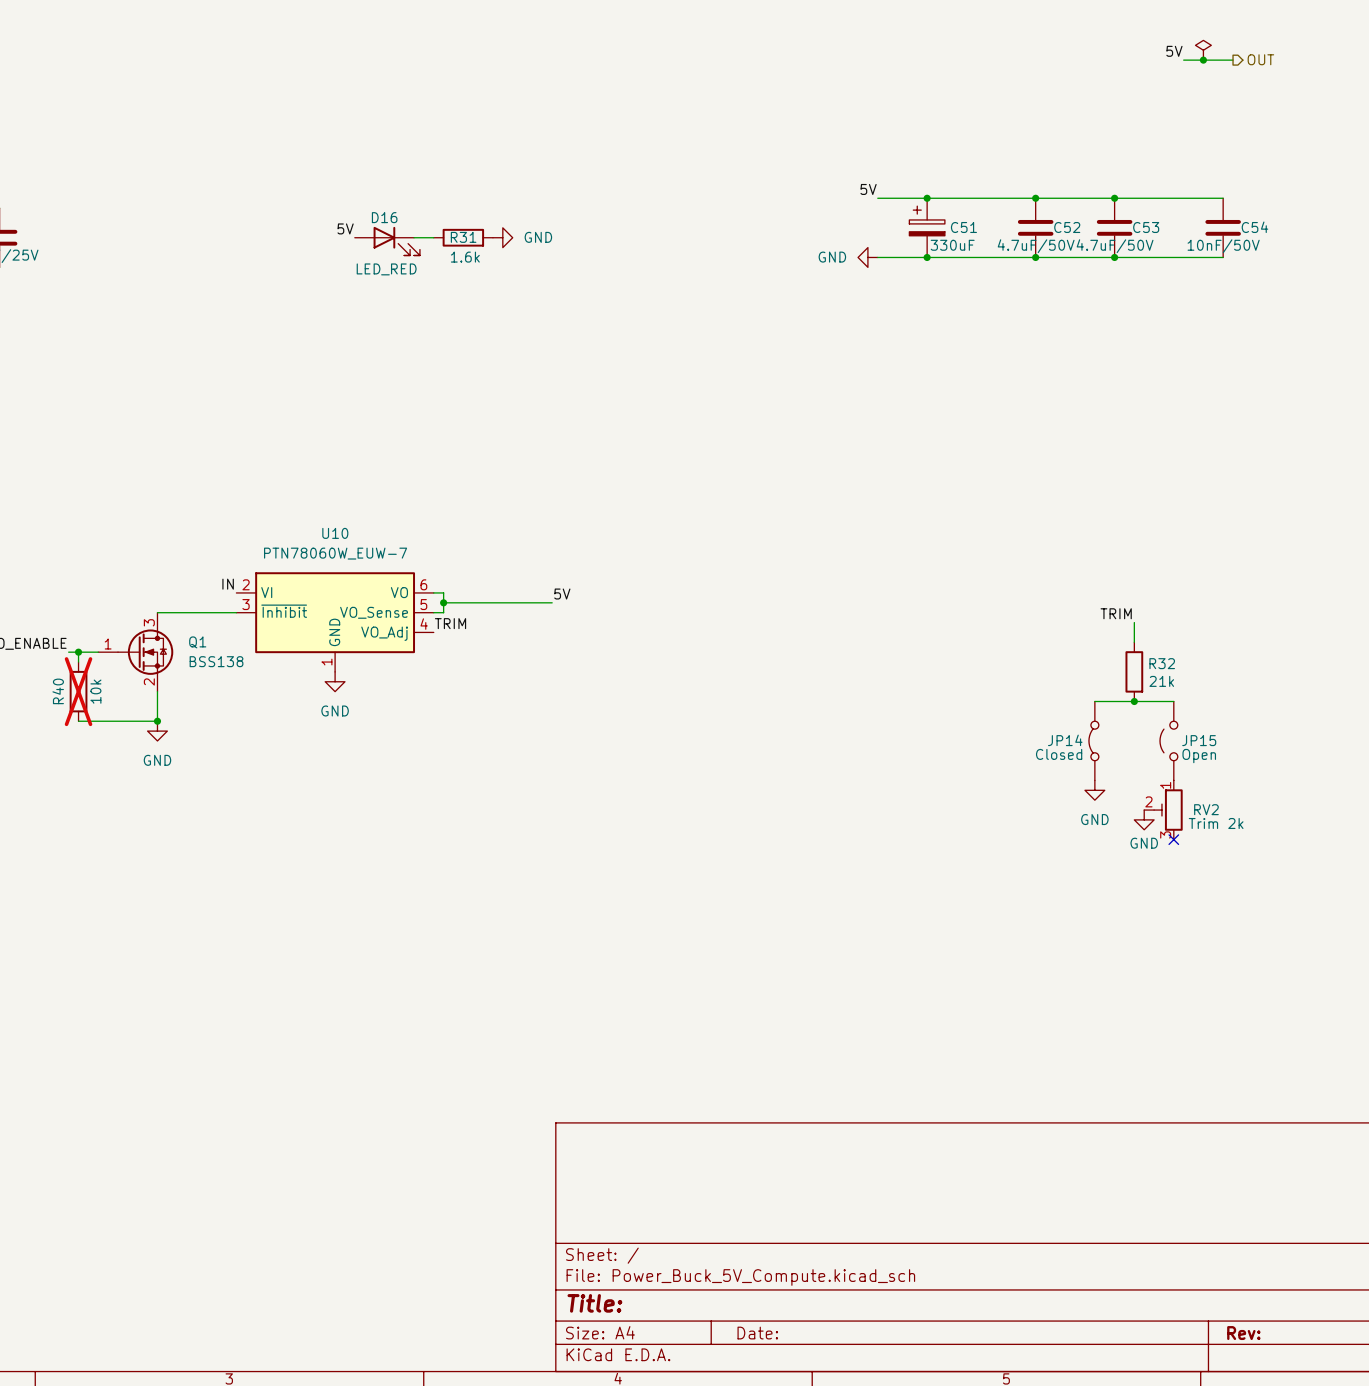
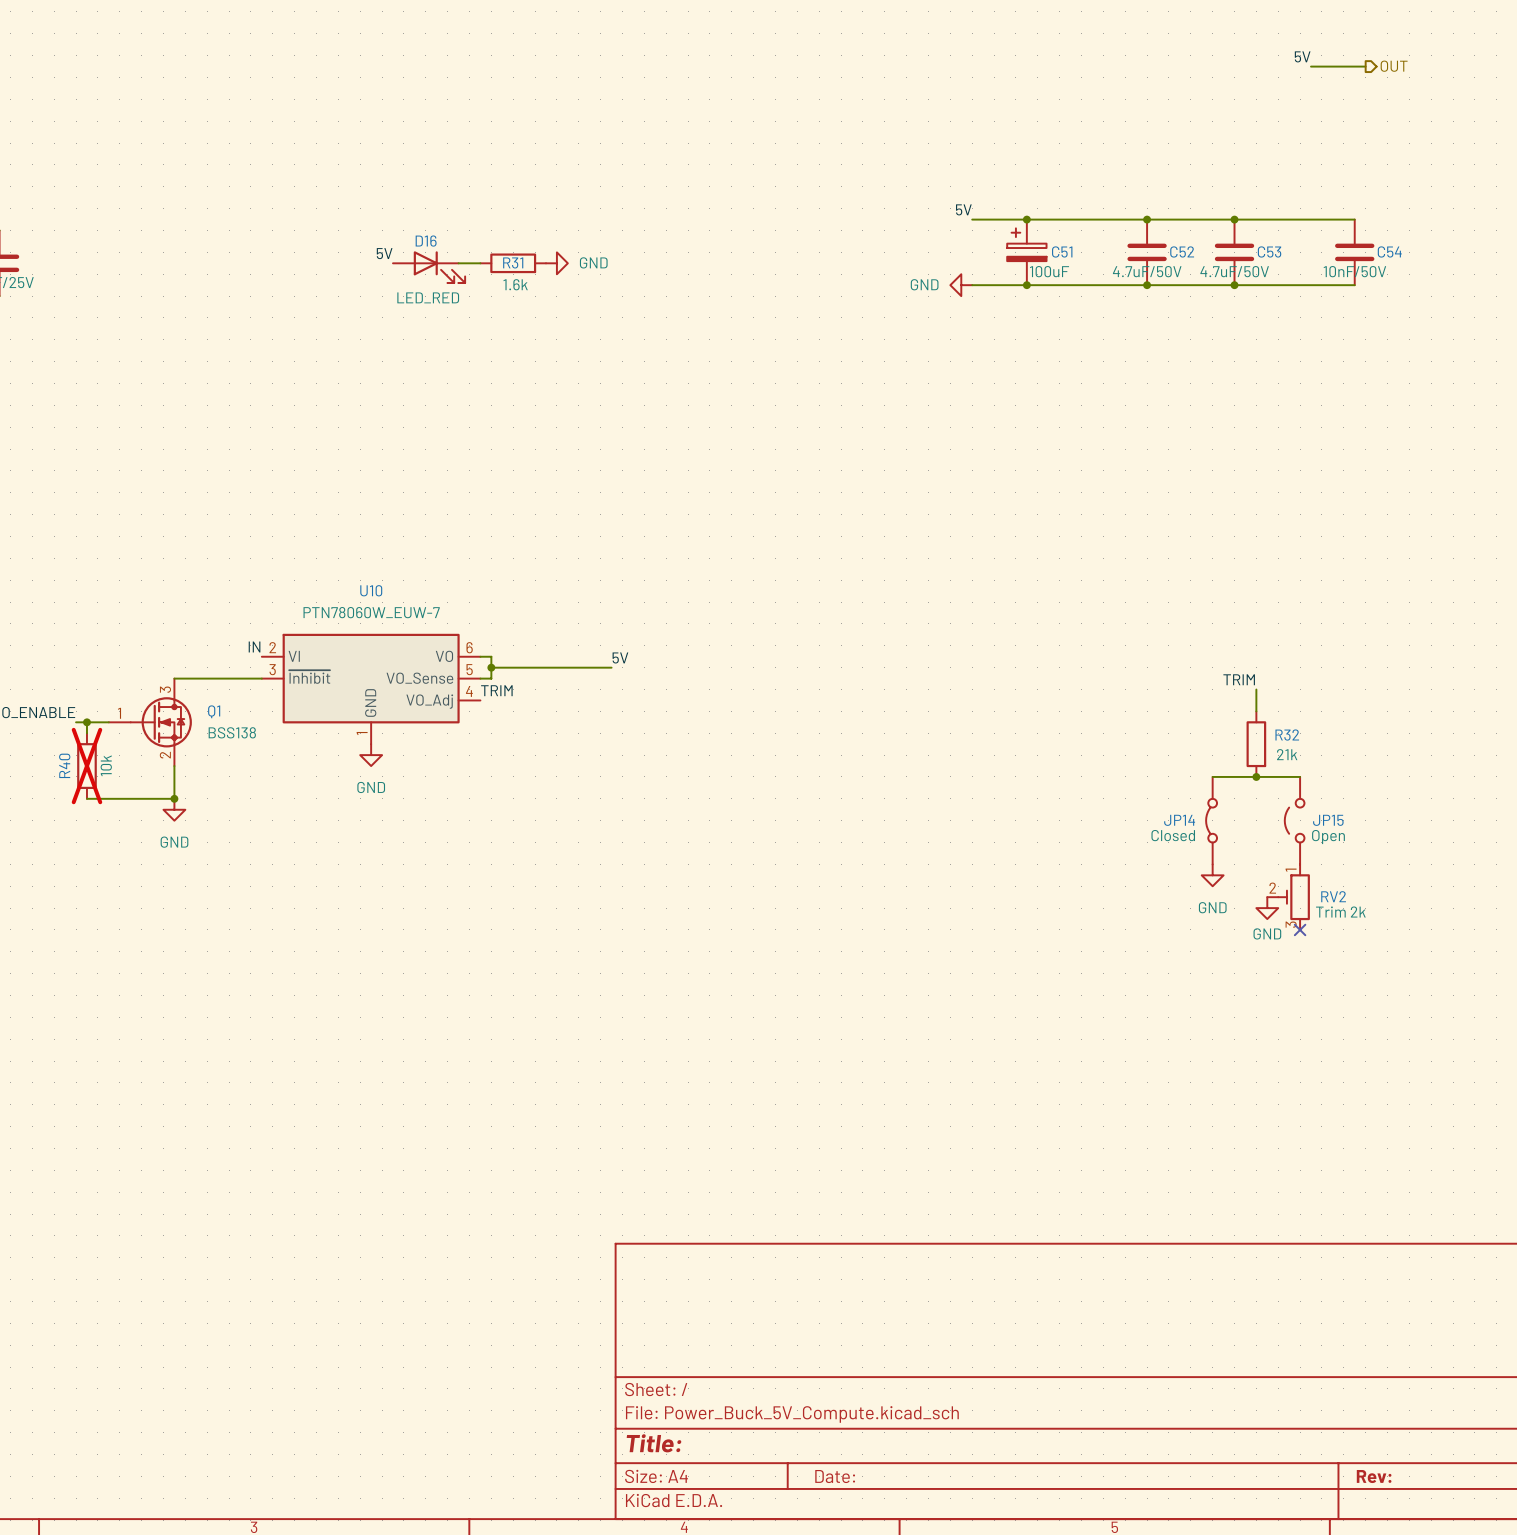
power symbol: (1203, 50) -> none
junction: (1203, 60) -> none
C51 value: 330uF (952, 245) -> 100uF (1049, 271)

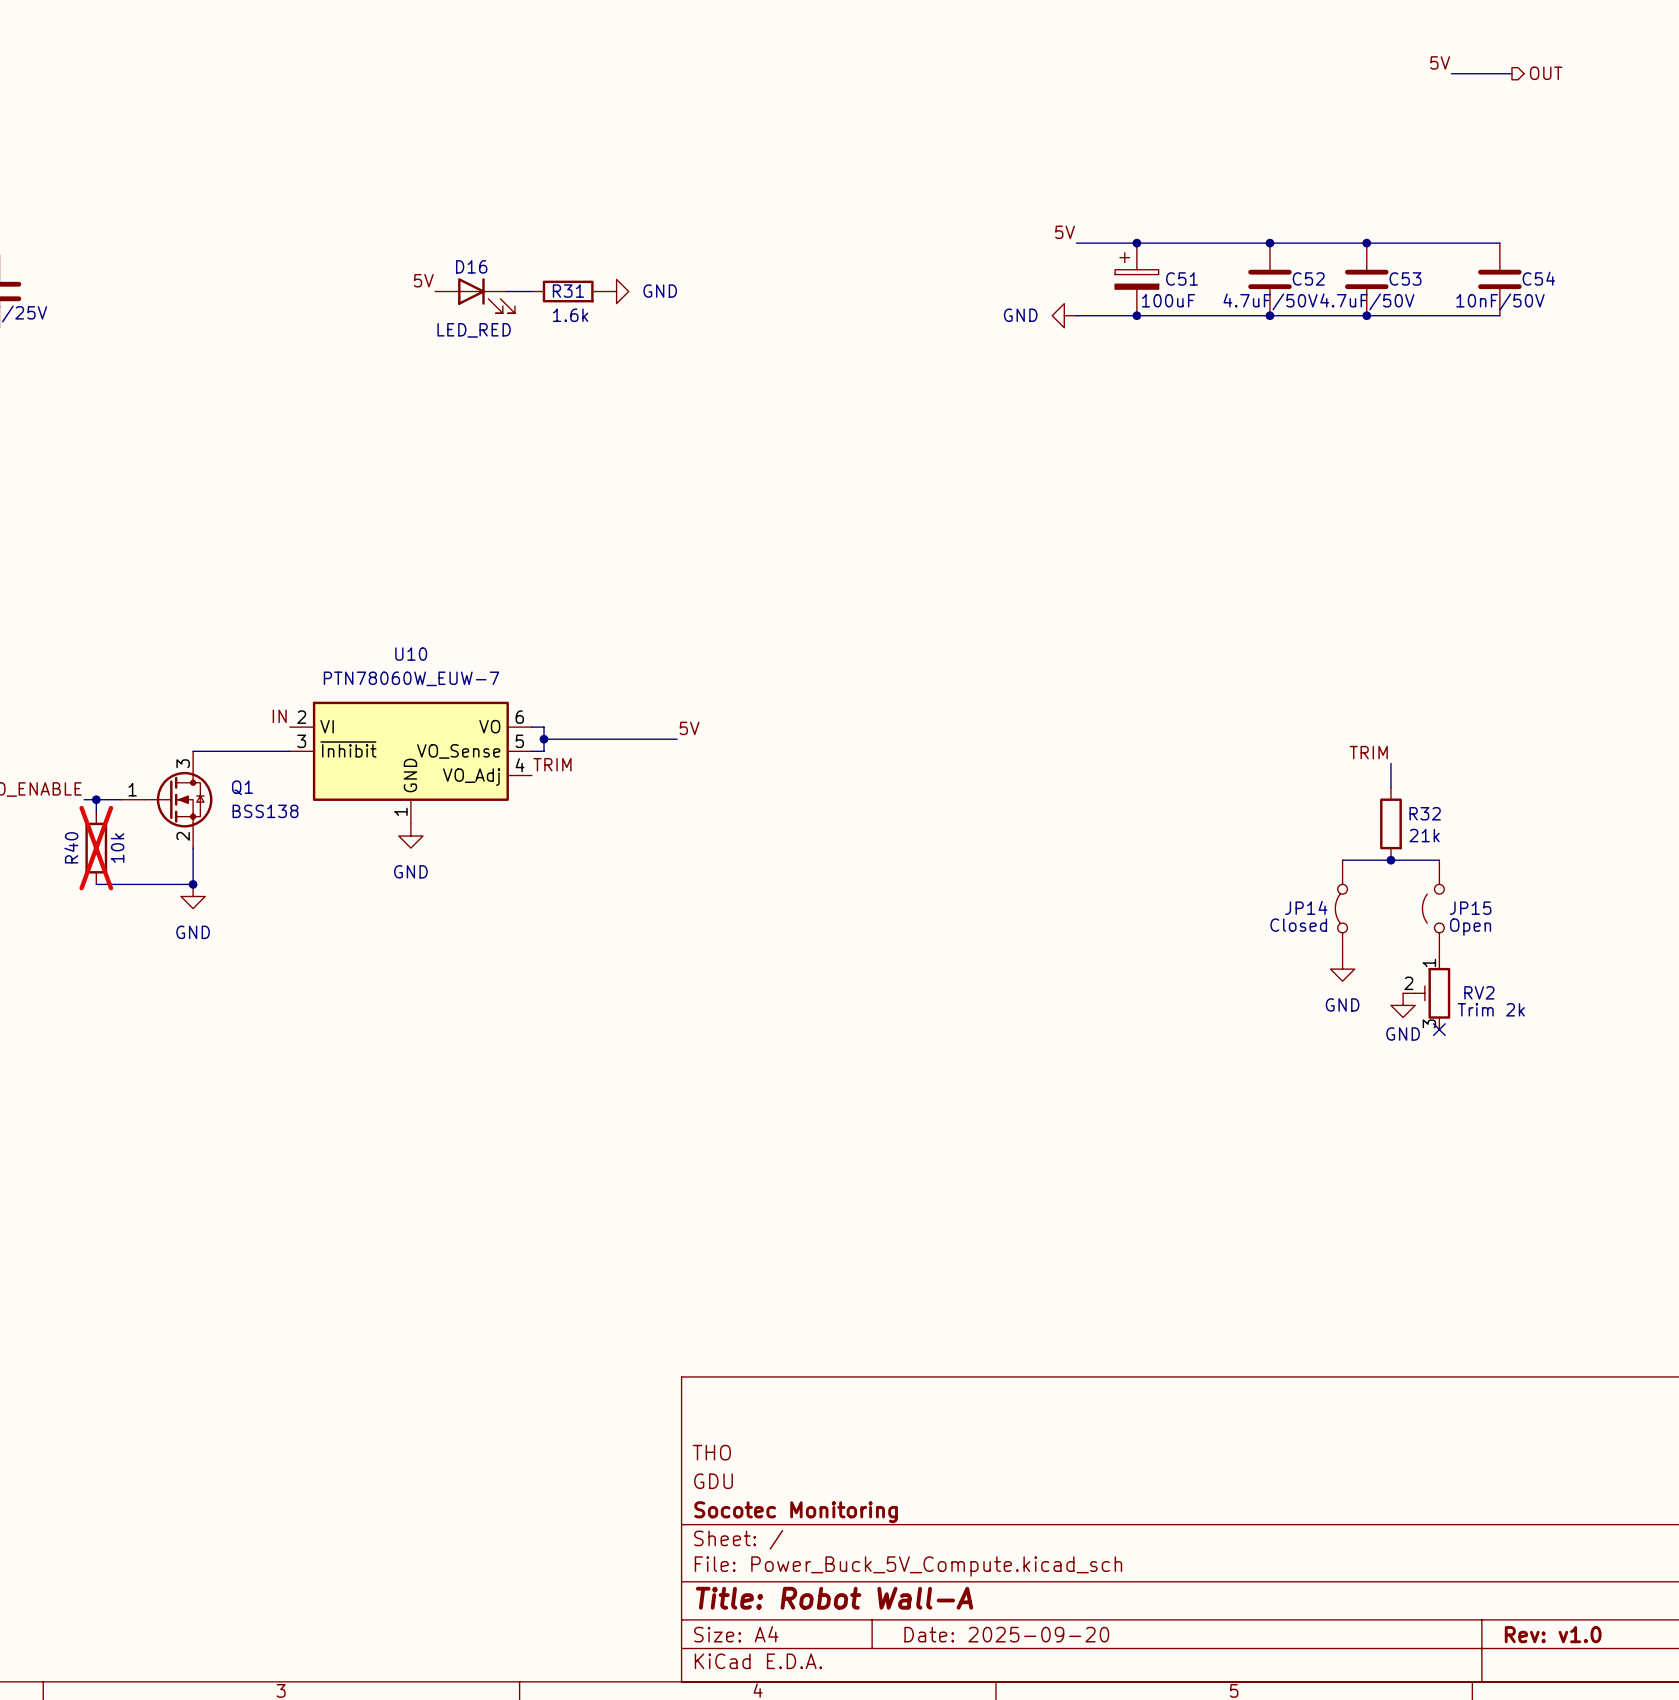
title block: none -> THO (711, 1452)
title block: none -> GDU (713, 1481)
title block: none -> Socotec Monitoring (796, 1512)
title block: Title: (654, 1443) -> Title: Robot Wall-A (834, 1598)
title block: Date: (835, 1476) -> Date: 2025-09-20 (1006, 1634)
title block: Rev: (1374, 1476) -> Rev: v1.0 (1553, 1634)

